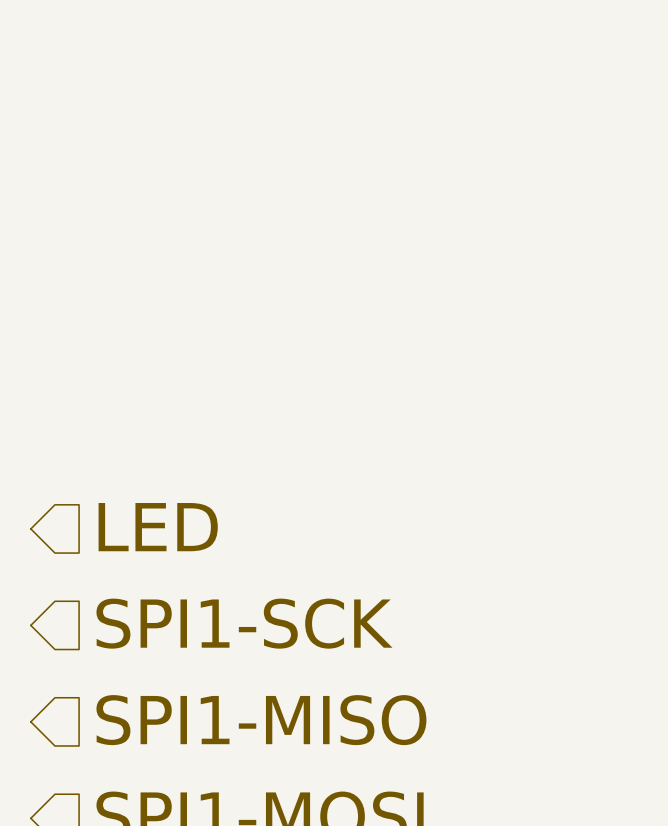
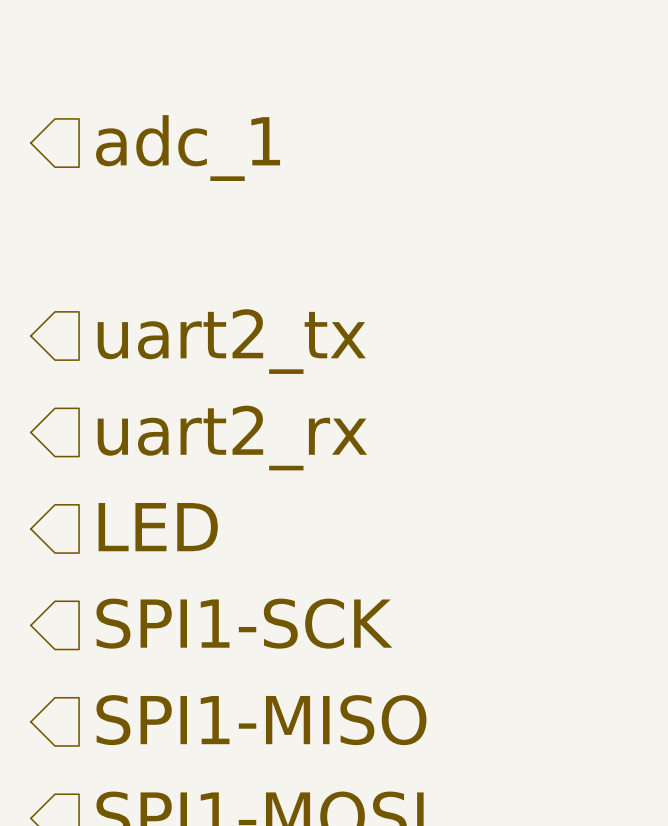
hierarchical label: none -> adc_1 (188, 148)
hierarchical label: none -> uart2_tx (231, 341)
hierarchical label: none -> uart2_rx (232, 438)

